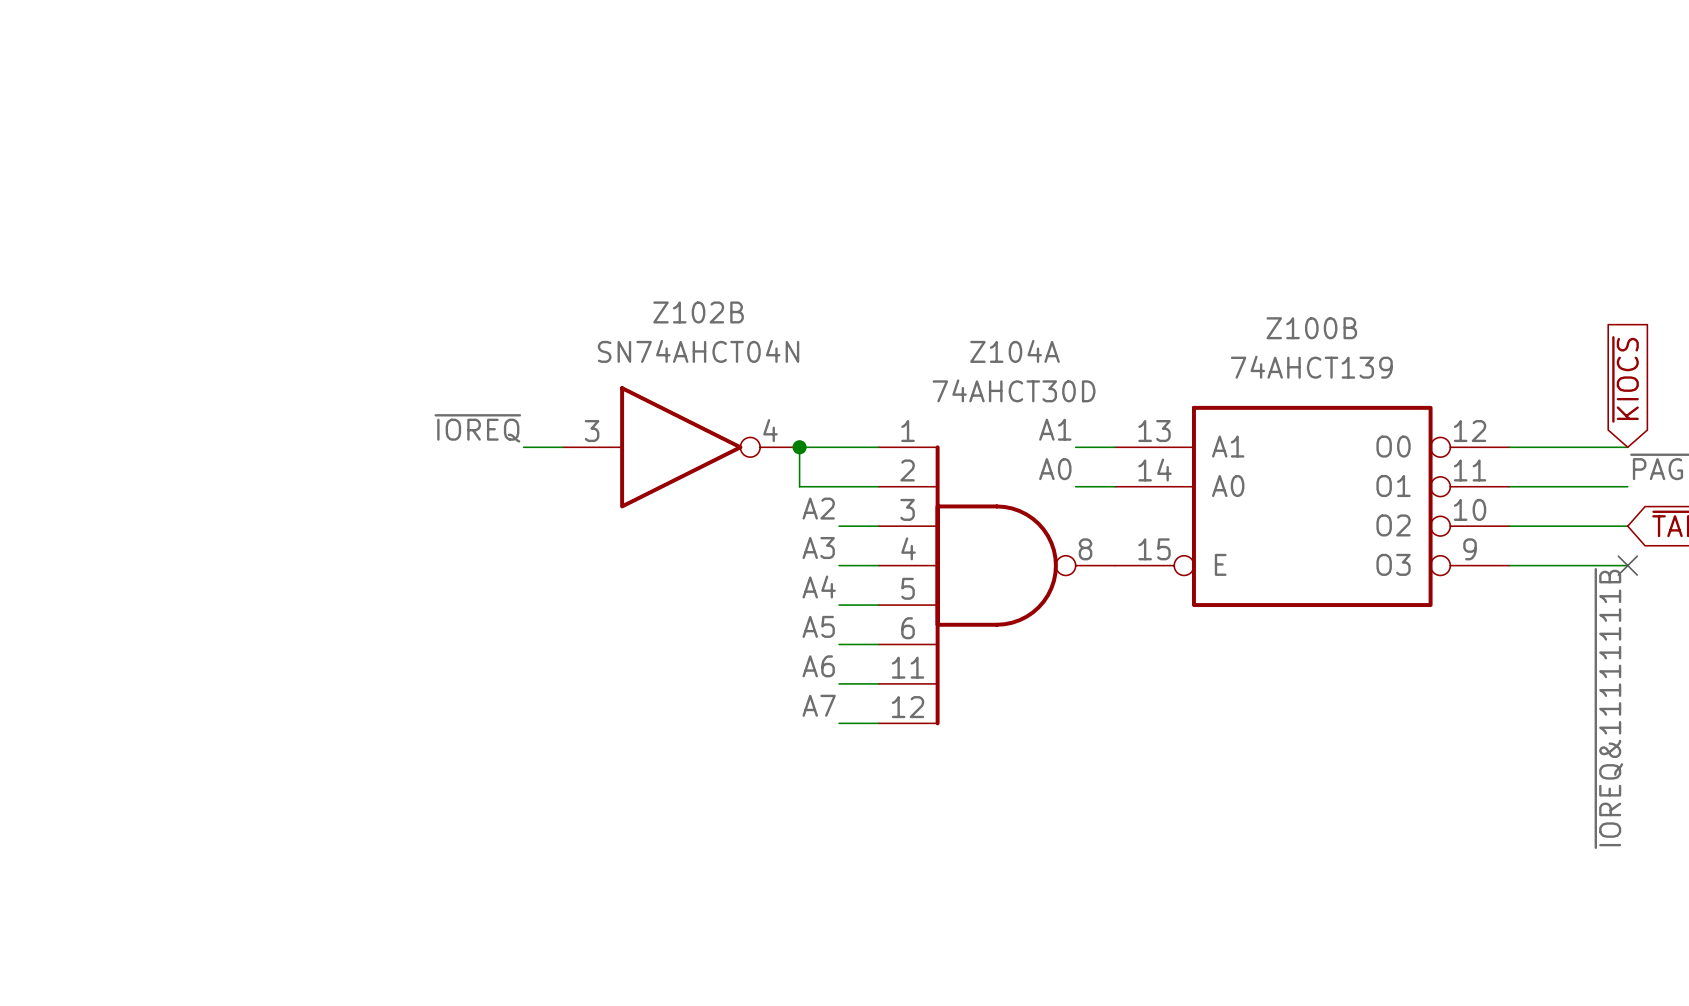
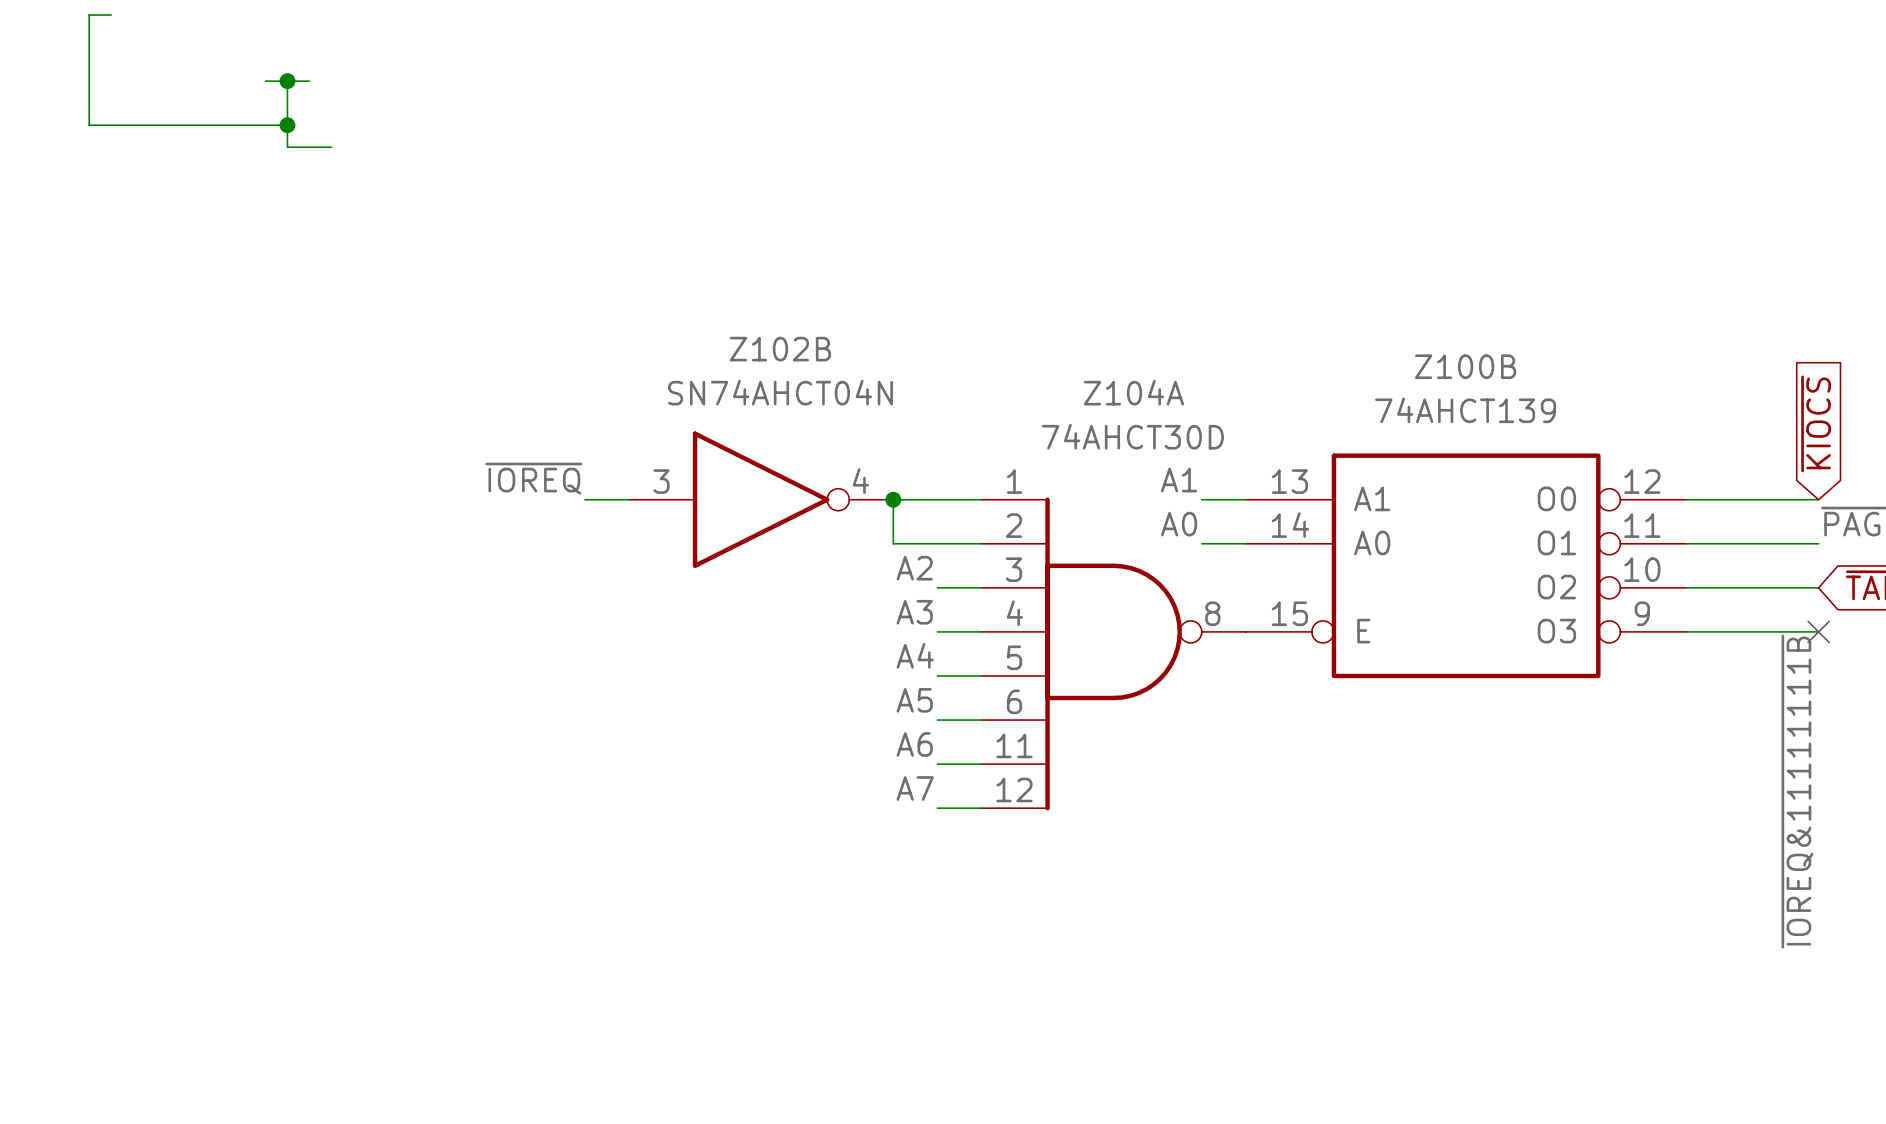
wire: none -> (111, 15) (89, 15) (89, 125) (287, 125)
wire: none -> (265, 81) (309, 81)
wire: none -> (287, 81) (287, 147) (331, 147)
junction: none -> (287, 81)
junction: none -> (287, 125)

